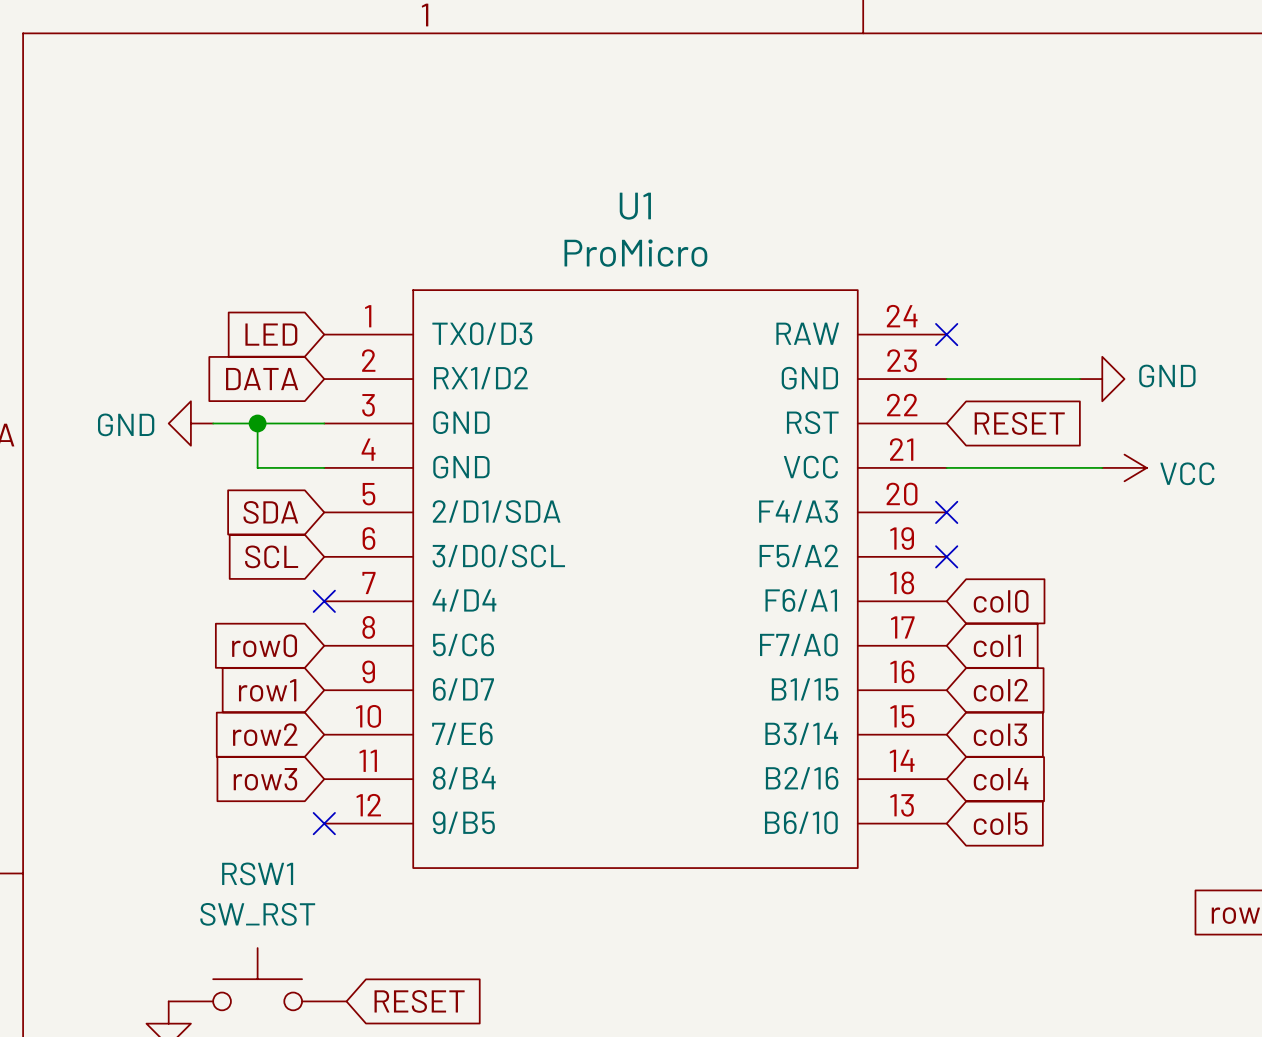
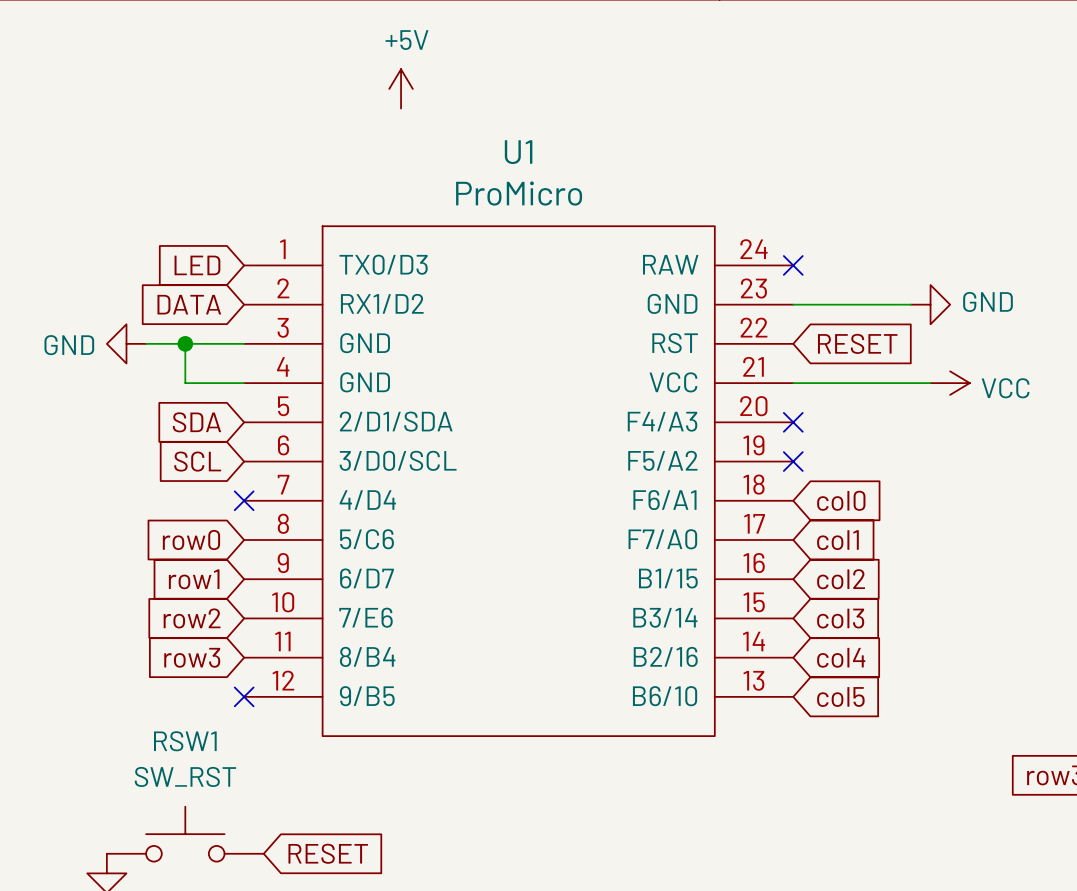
power symbol: none -> +5V (401, 88)

